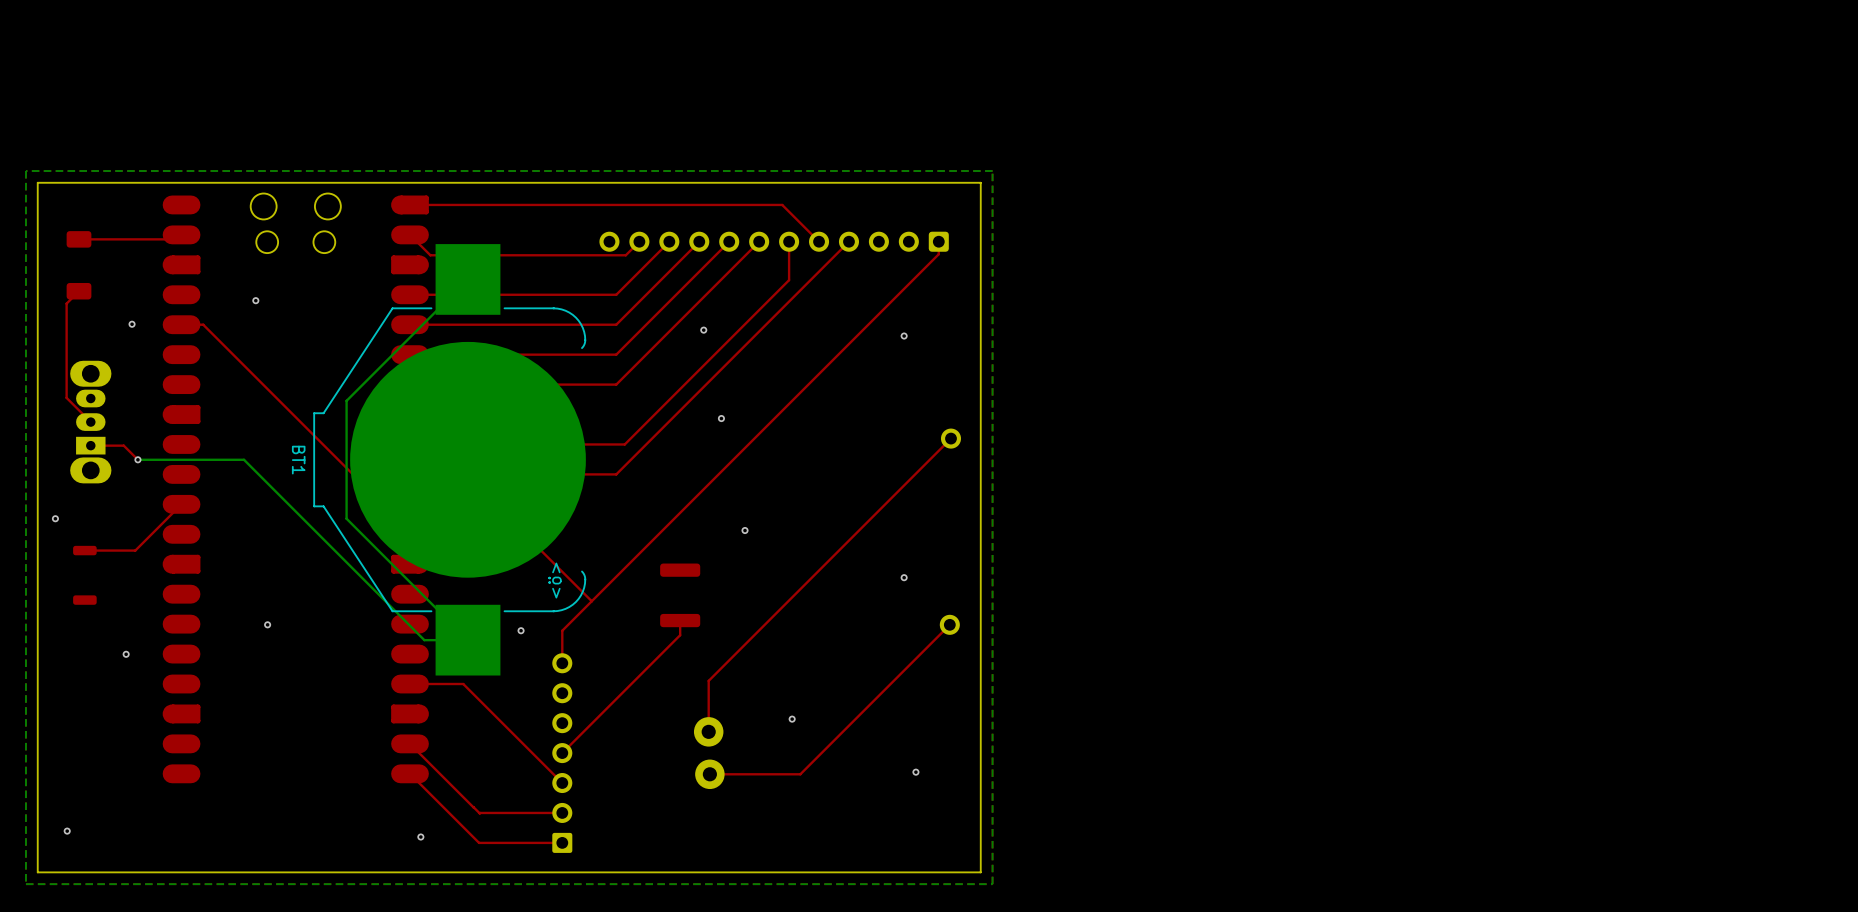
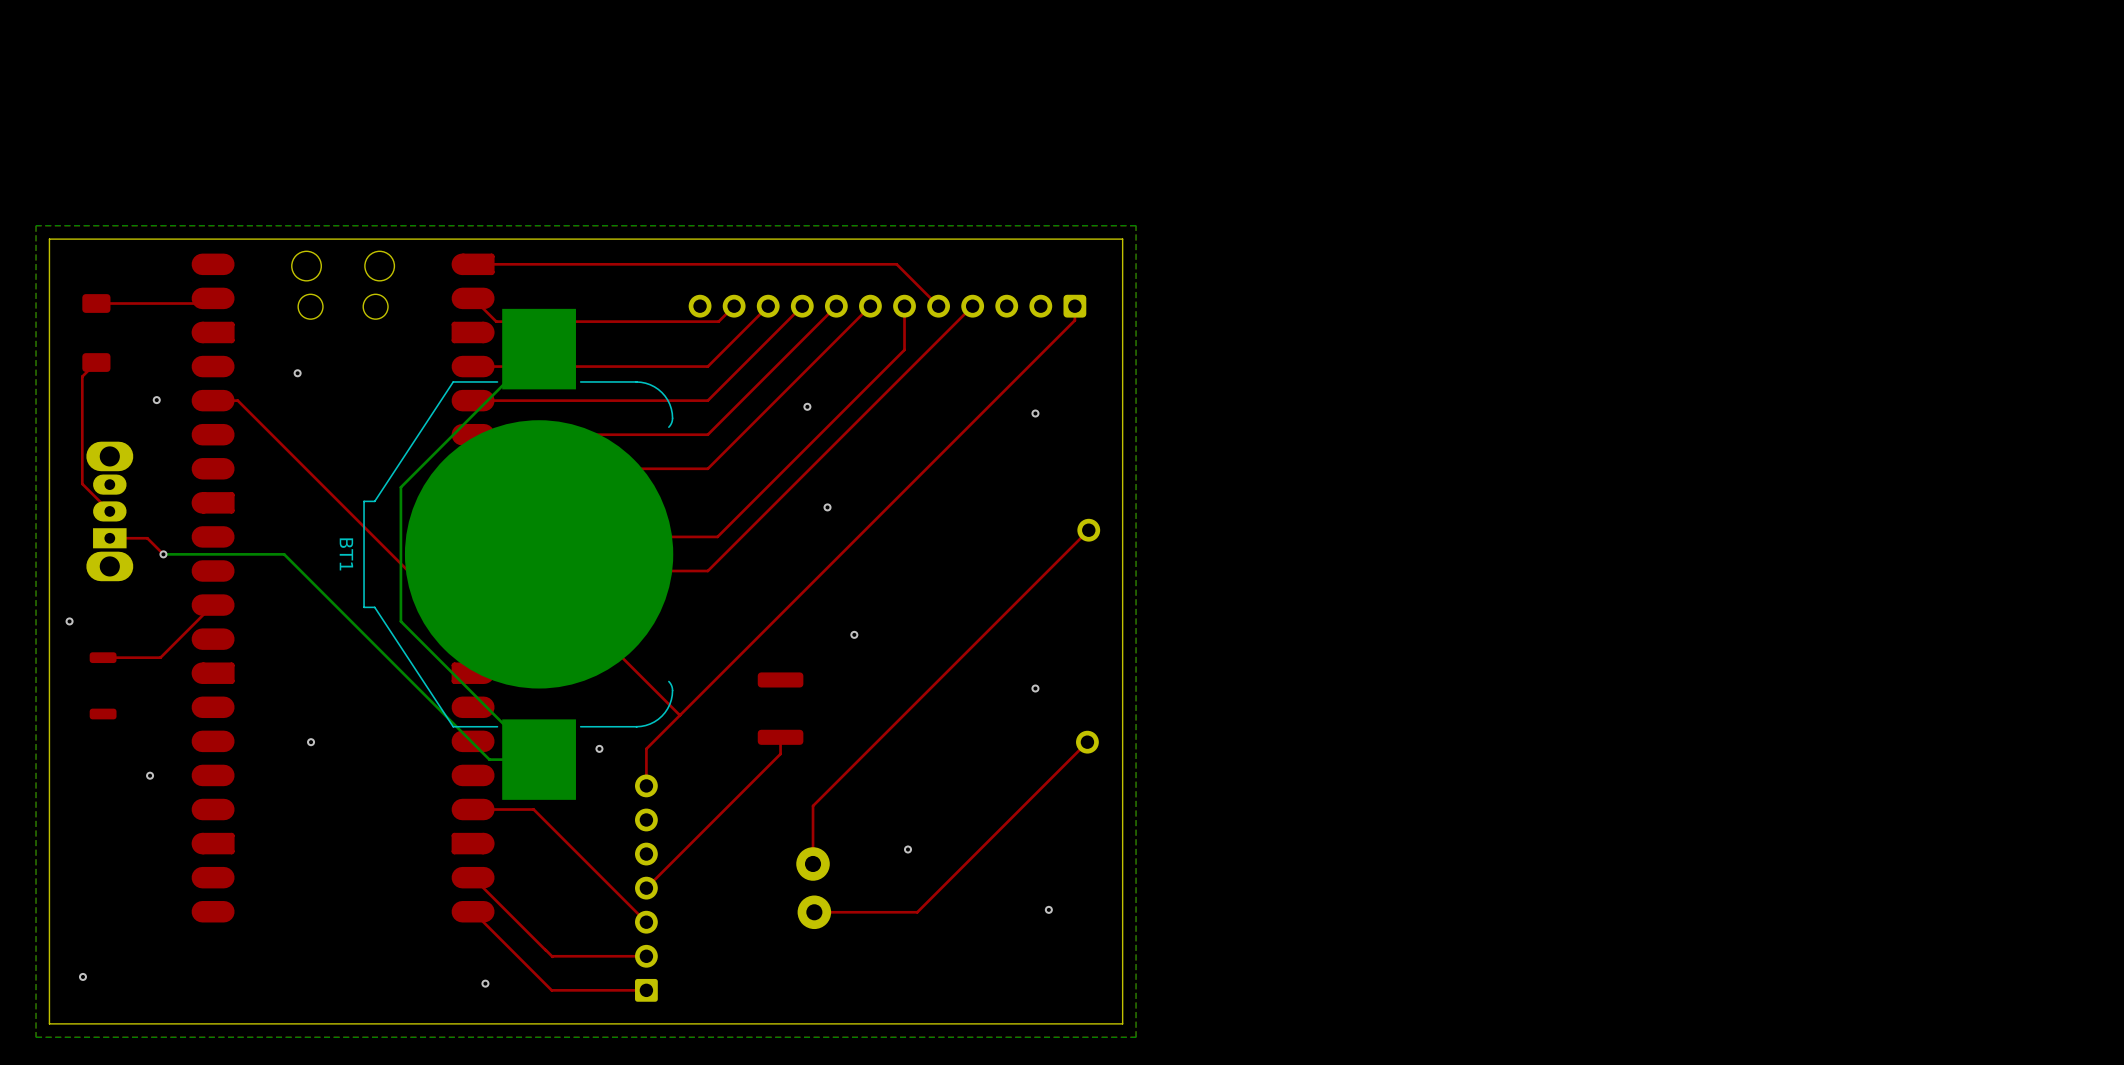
text: <ö> (554, 580) -> none

